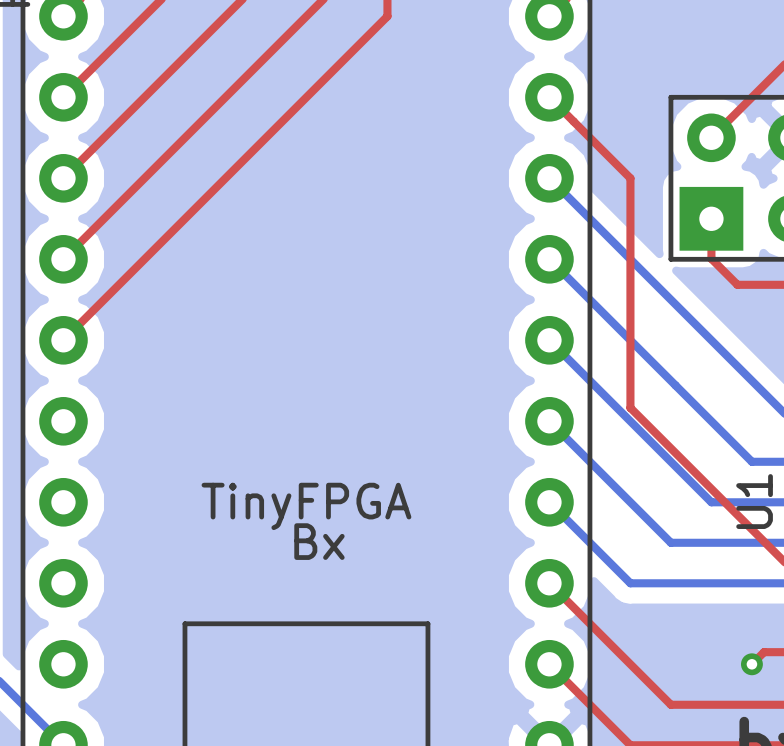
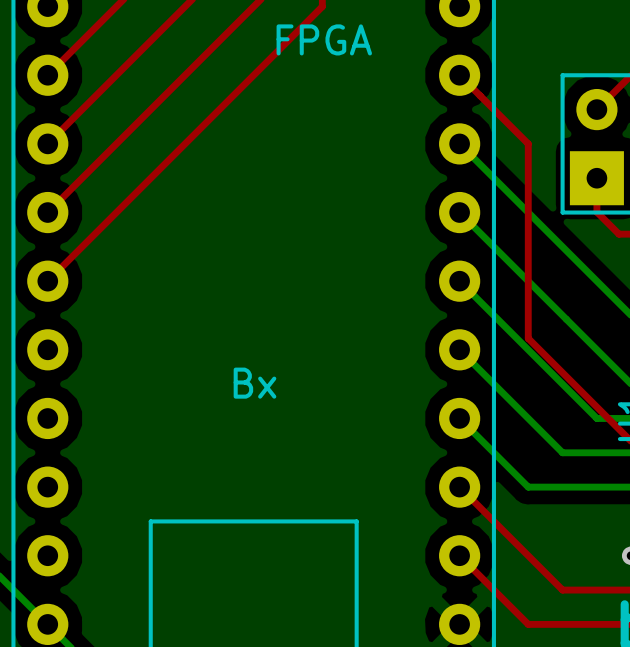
part text: none -> FPGA (324, 39)
part text: none -> Bx (254, 383)
part text: TinyFPGA (306, 506) -> none
part value: Bx (319, 541) -> none

